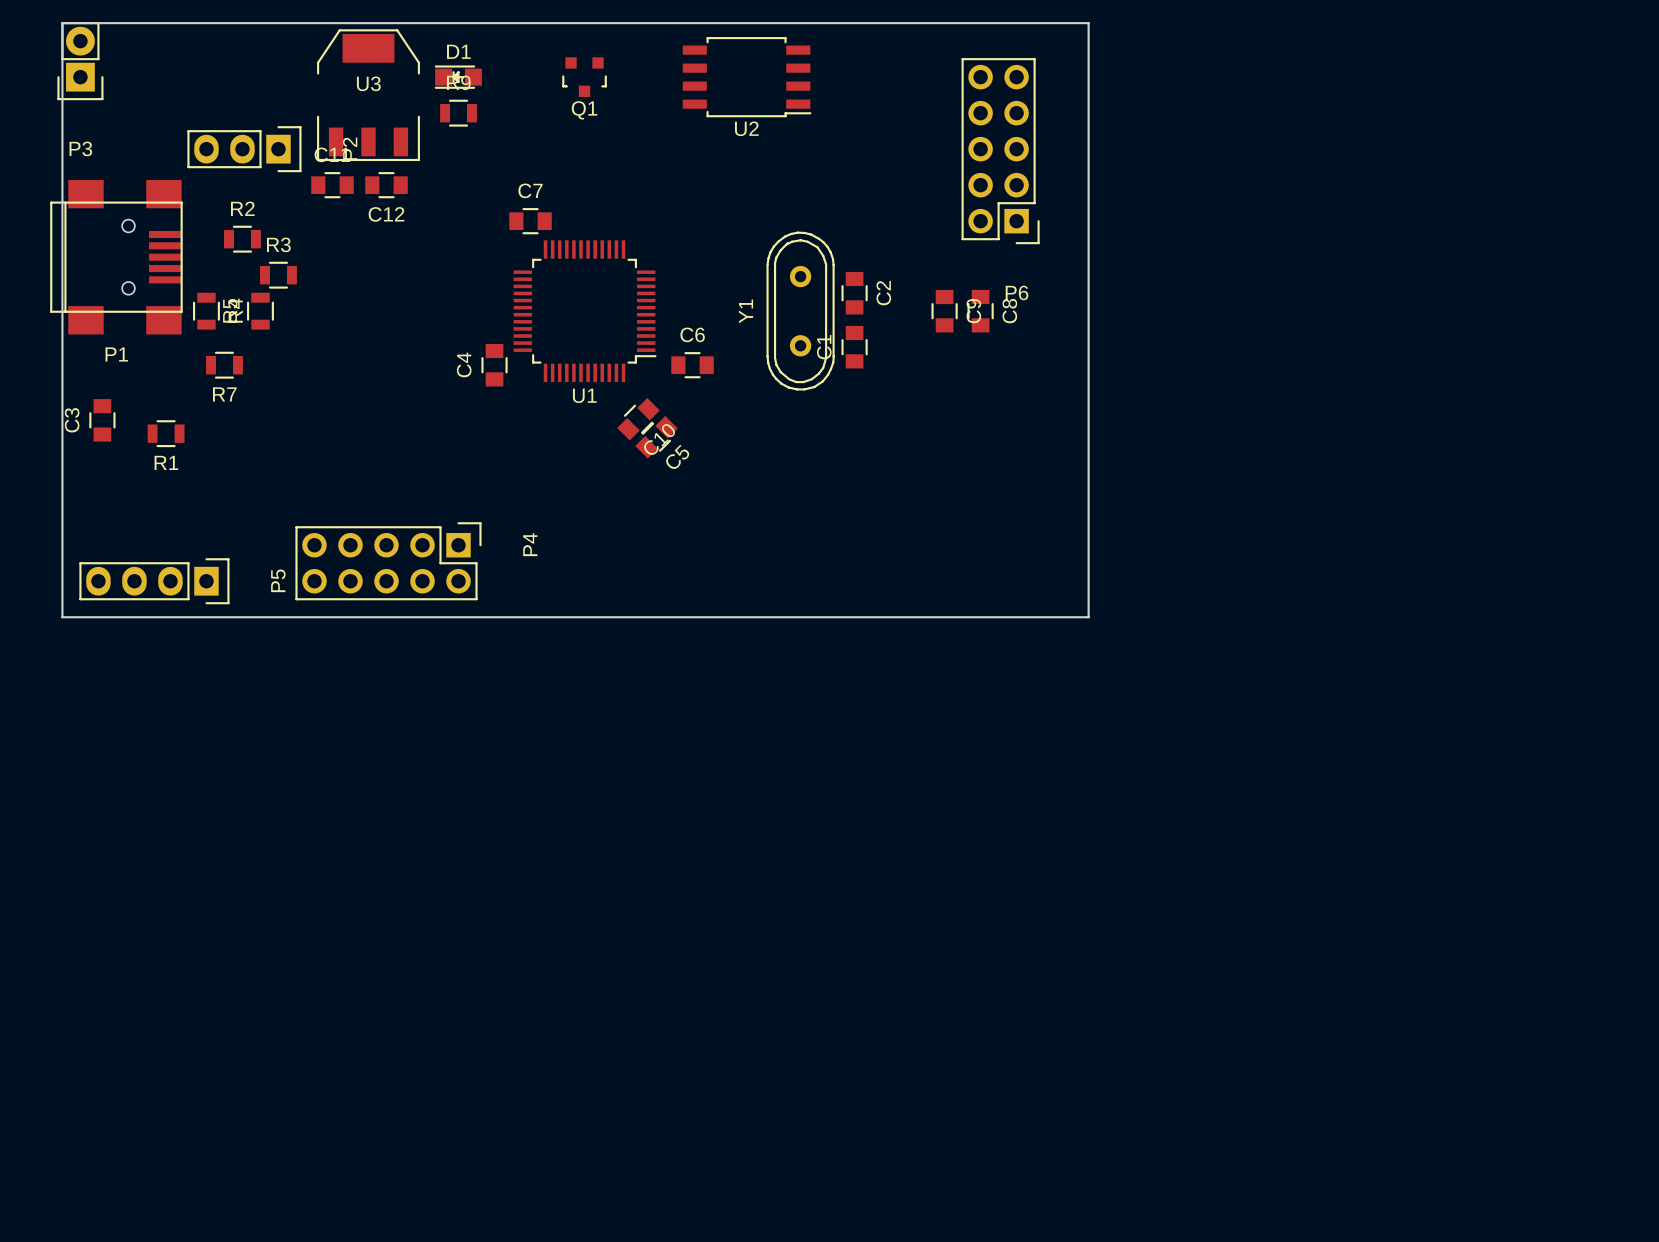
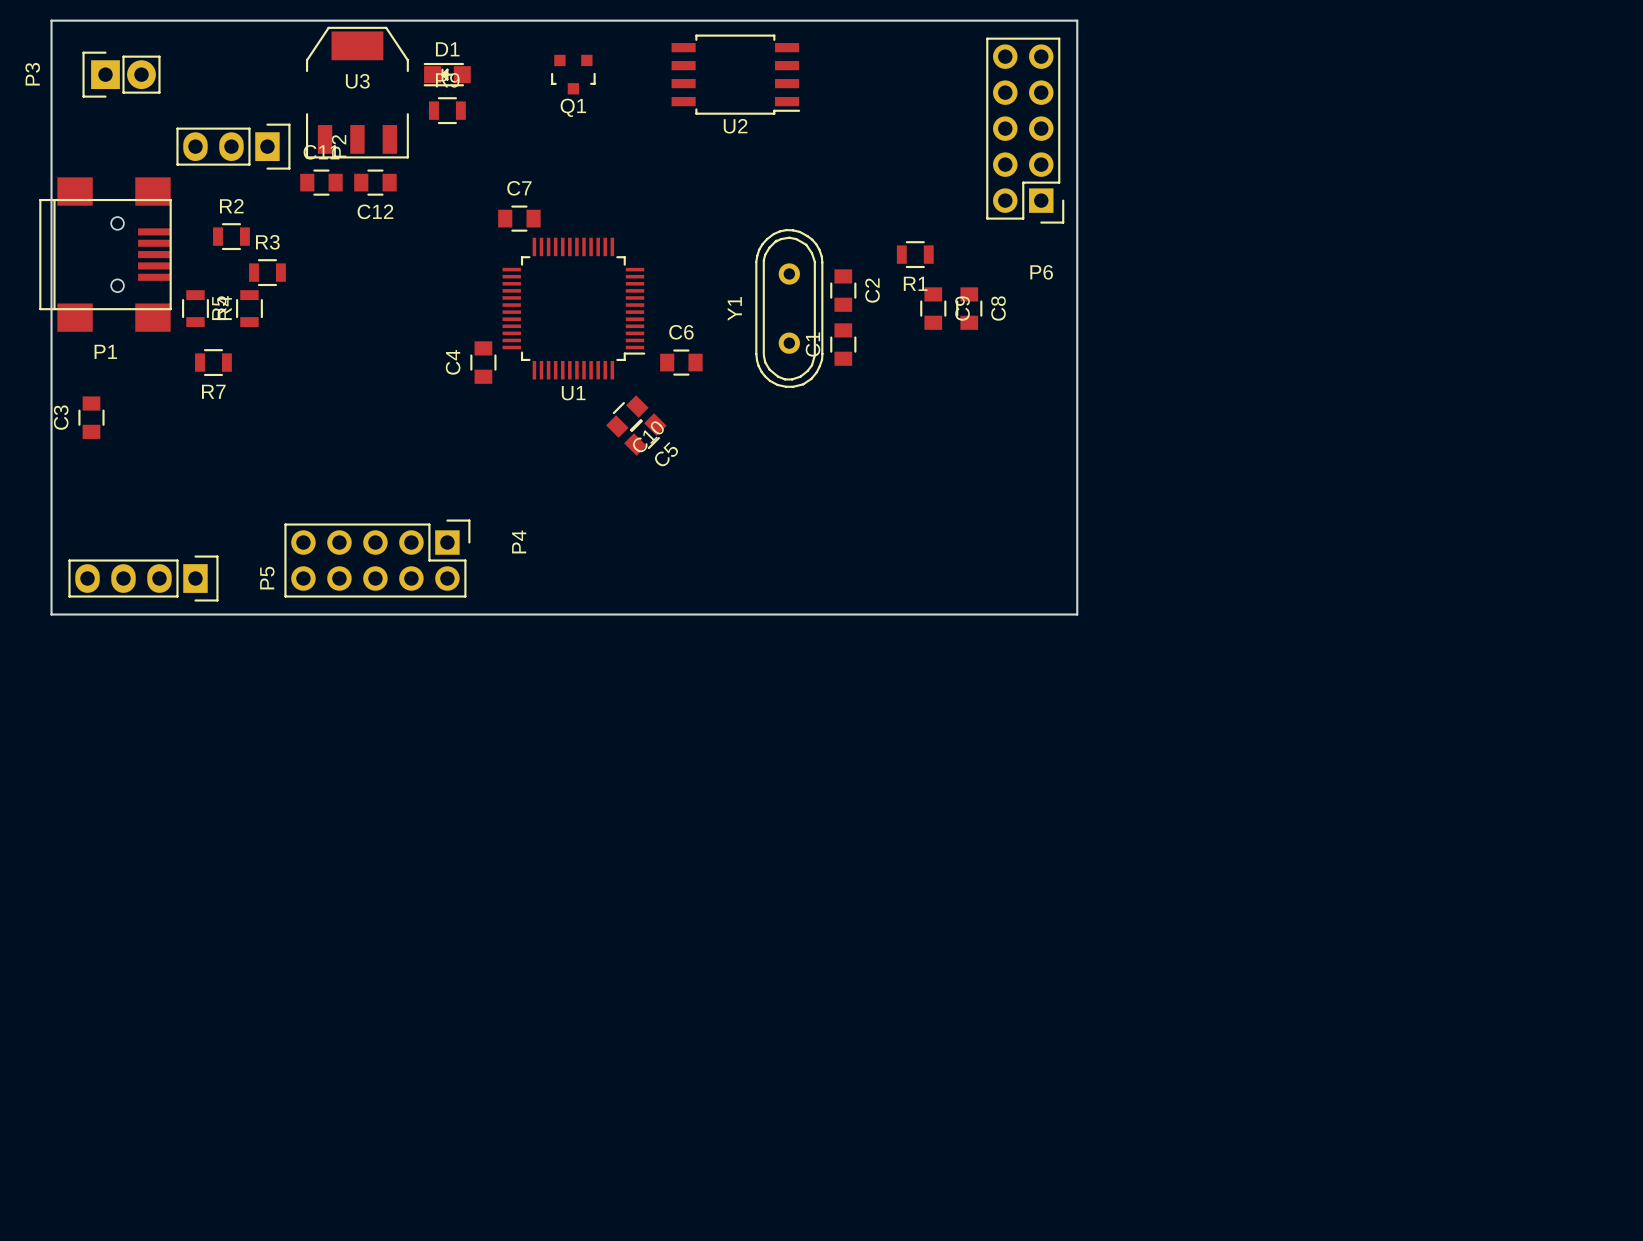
P3 rotation: 0° (80, 61) -> 90° clockwise (121, 74)
P3 position: (80, 61) -> (121, 74)
P6 position: (1000, 151) -> (1025, 130)
R1 position: (166, 433) -> (915, 254)

